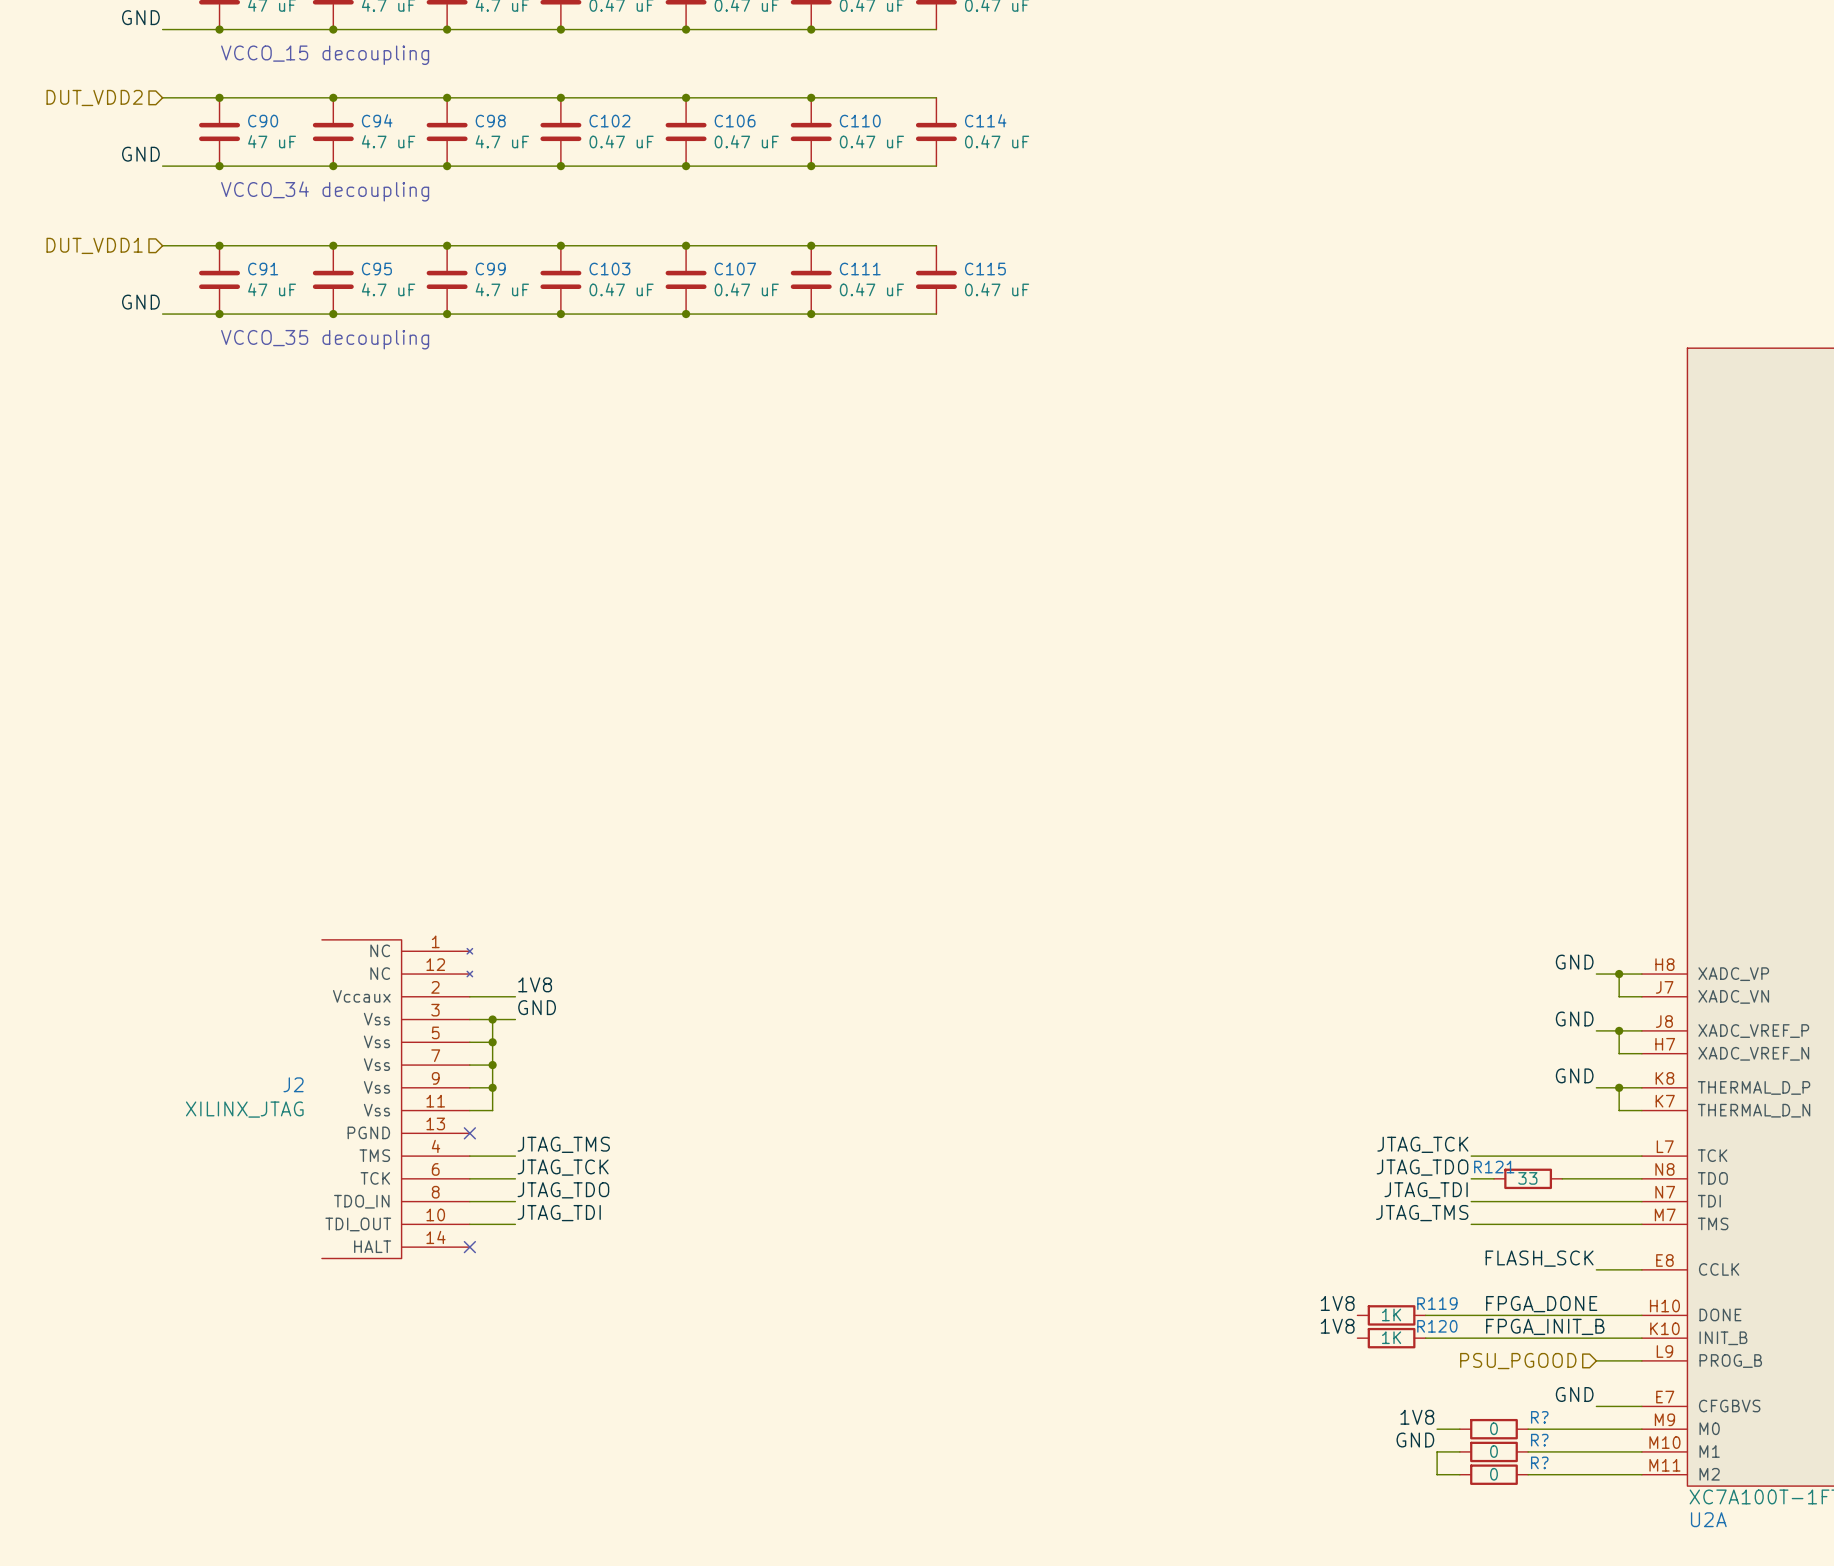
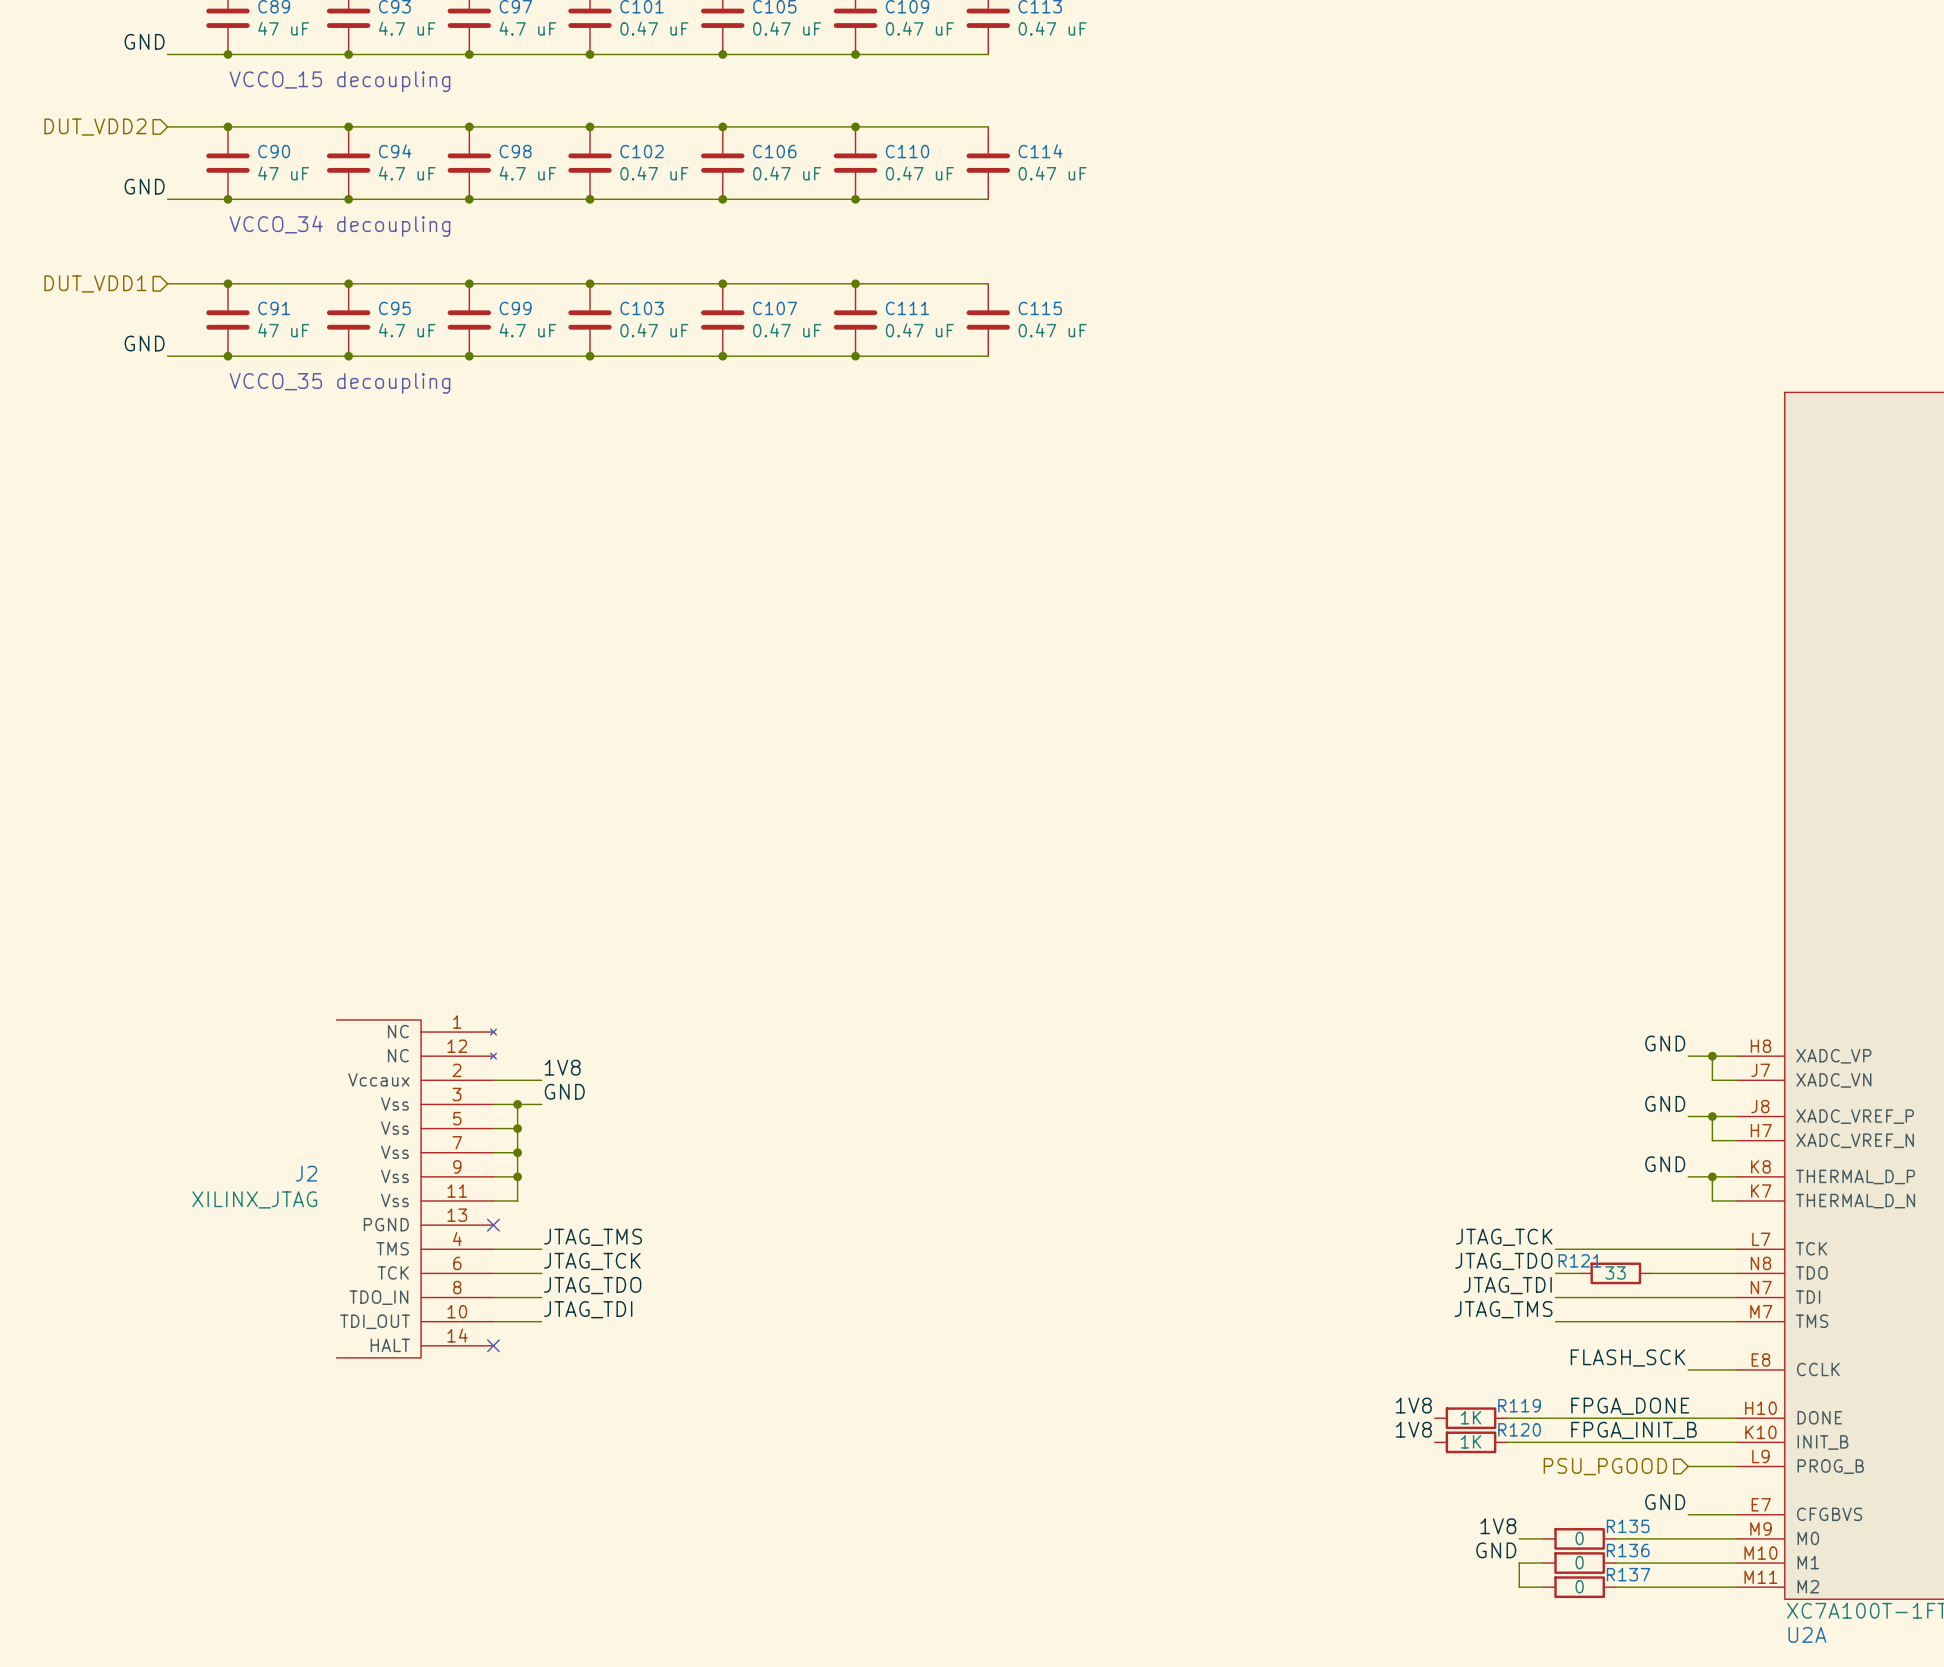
R? name: R? (1539, 1417) -> R135 (1628, 1526)
R? name: R? (1539, 1440) -> R136 (1628, 1550)
R? name: R? (1539, 1462) -> R137 (1628, 1574)

